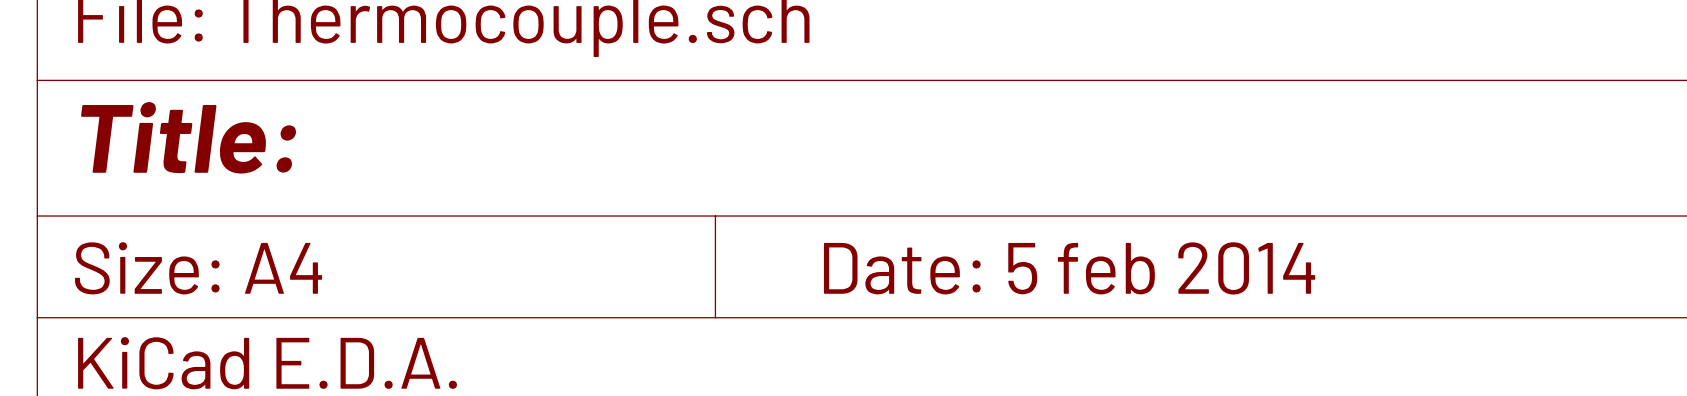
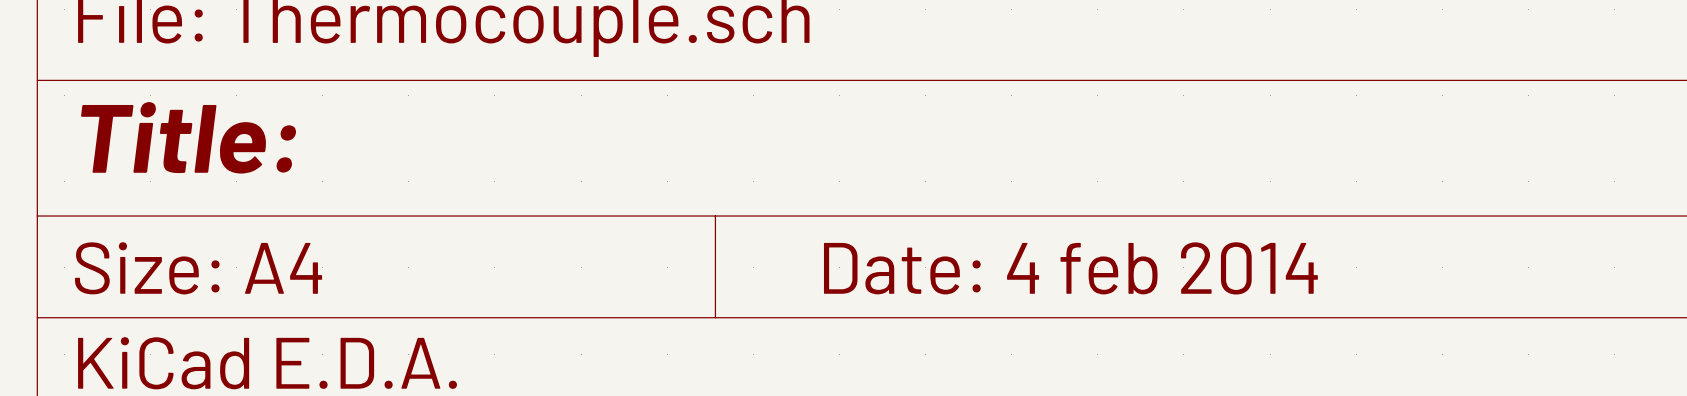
title block: Date: 5 feb 2014 (1069, 268) -> Date: 4 feb 2014 (1070, 268)

